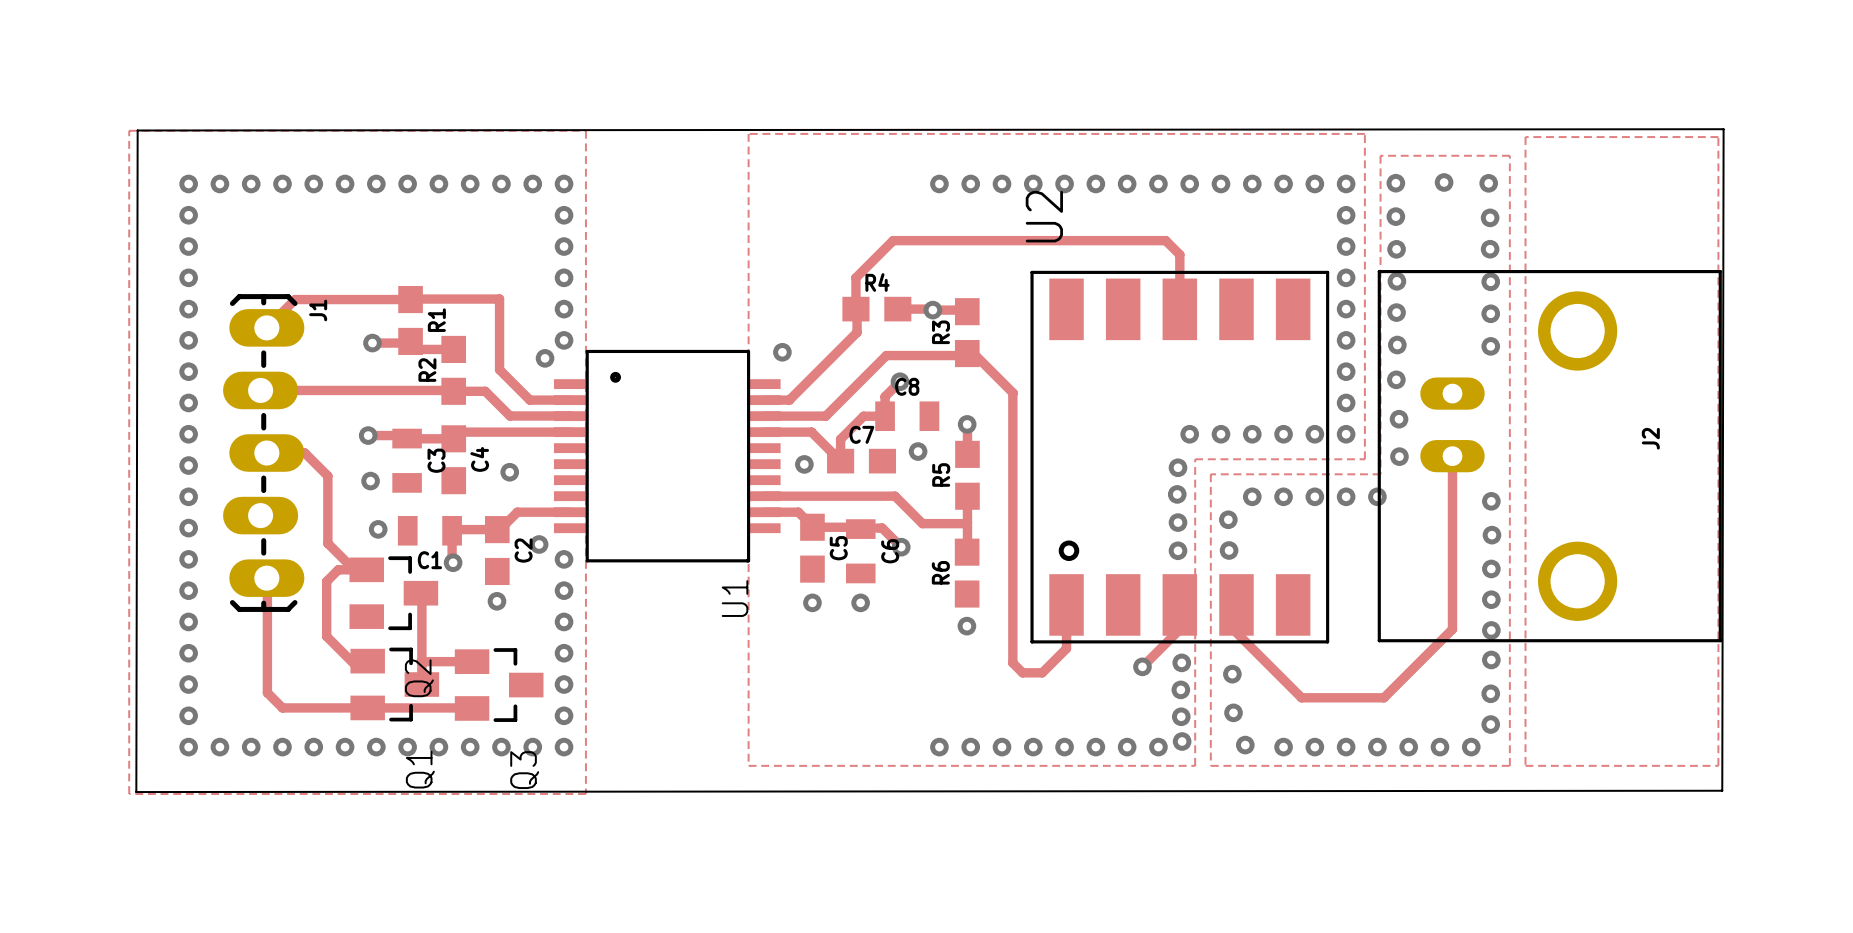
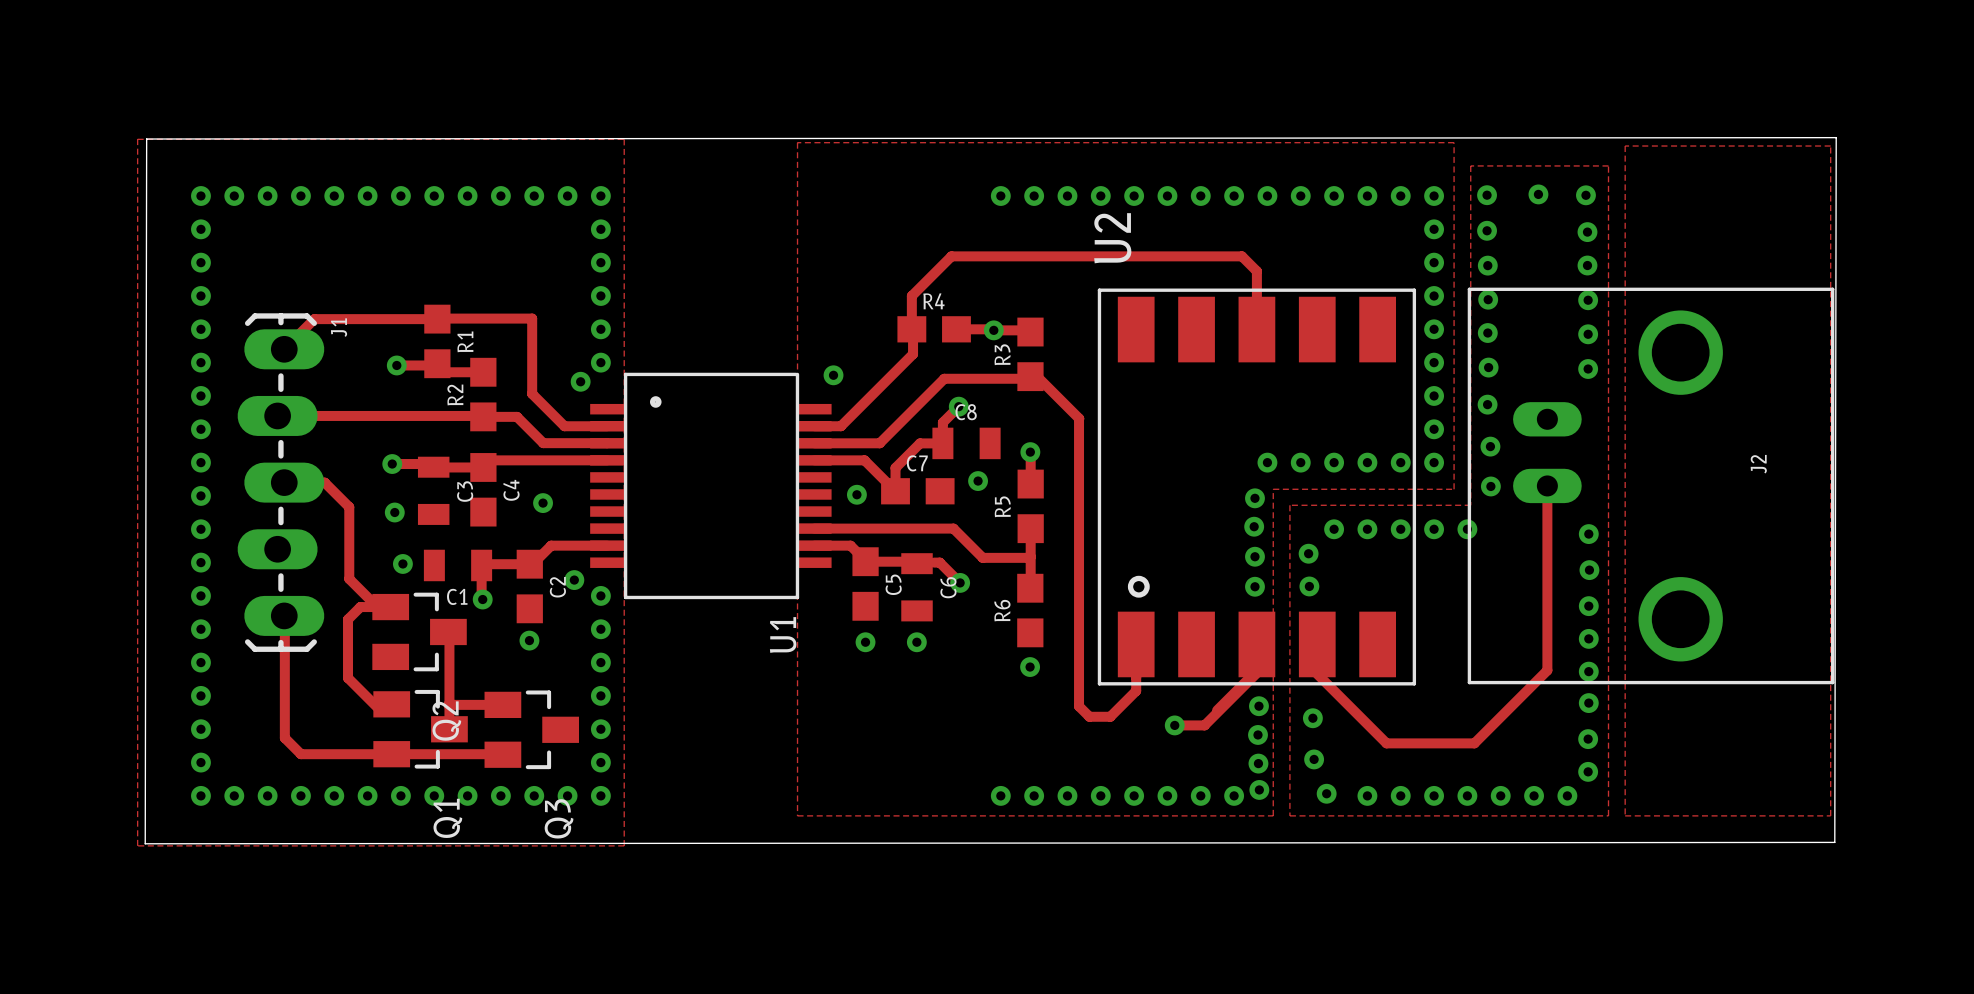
track: none -> (1256, 662) (1256, 673) (1204, 725) (1174, 725)
via position: (1142, 666) -> (1174, 725)

